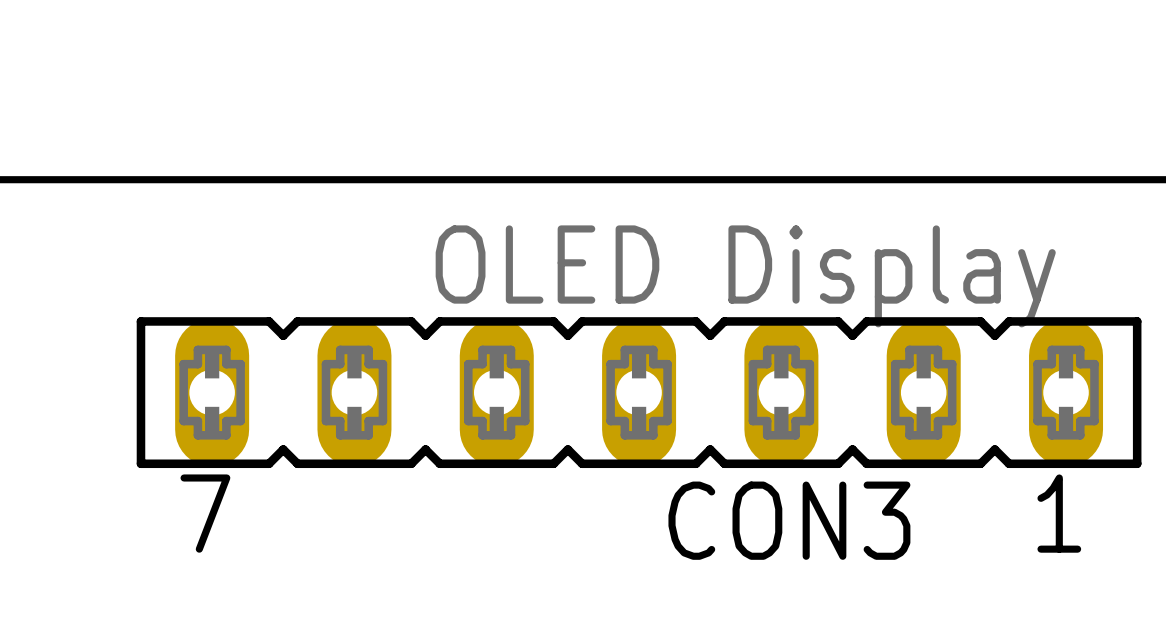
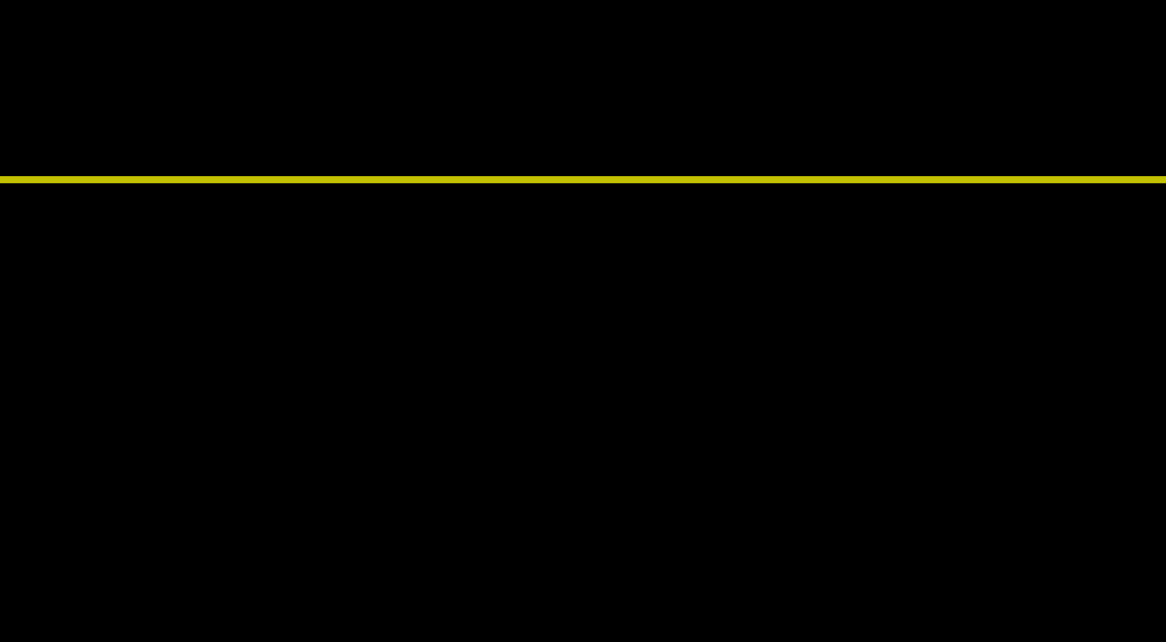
CON3: OLED Display (639, 392) -> none

